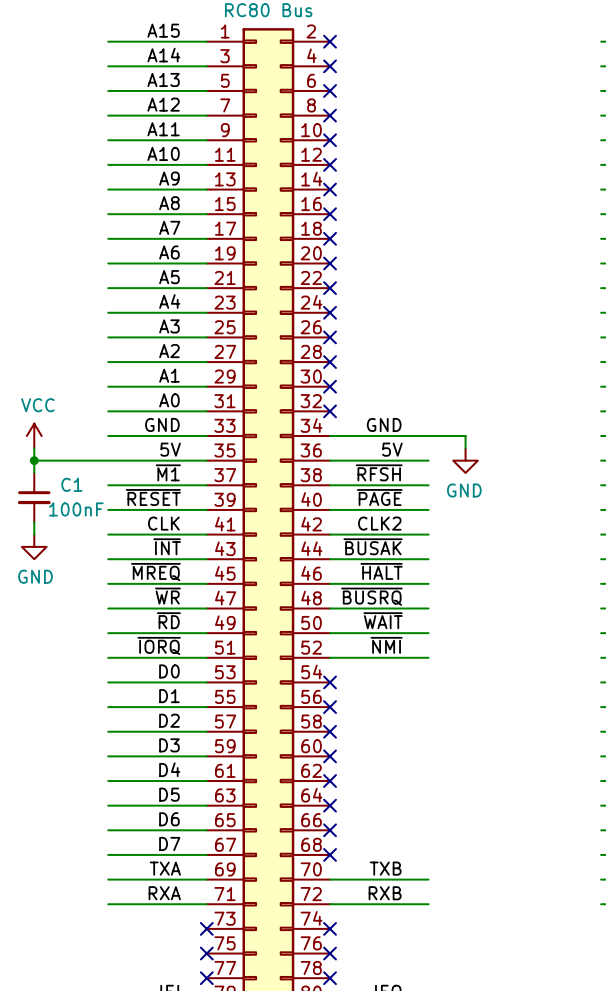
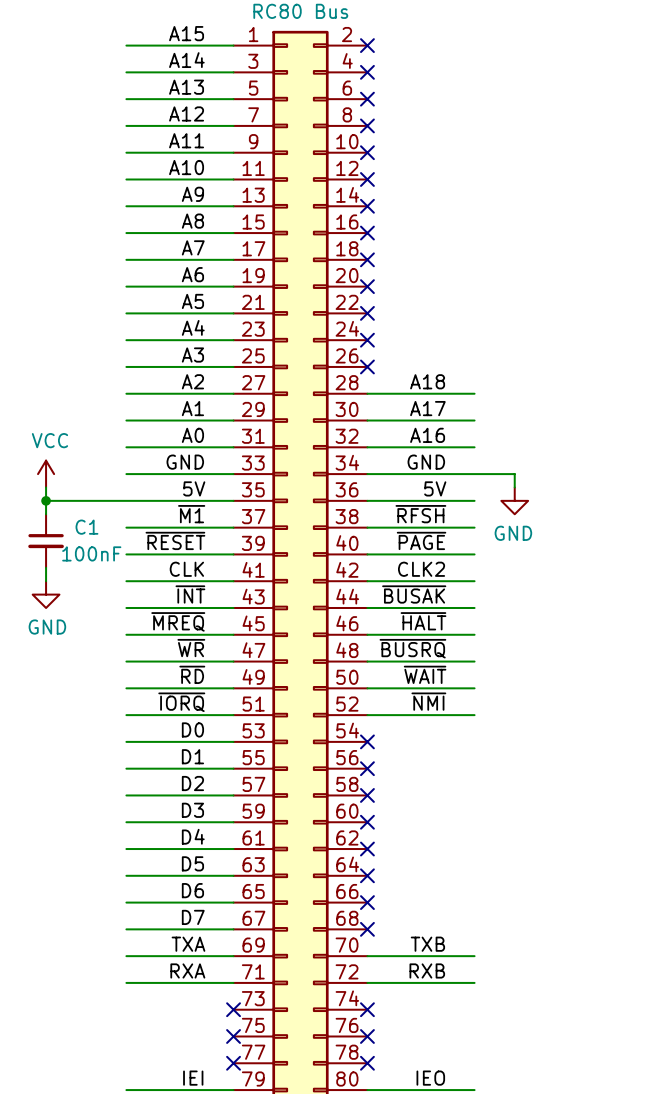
label: none -> A18 (427, 381)
wire: none -> (367, 393) (474, 393)
no-connect mark: (330, 362) -> none
label: none -> A17 (427, 408)
wire: none -> (367, 420) (474, 420)
no-connect mark: (330, 386) -> none
label: none -> A16 (427, 435)
wire: none -> (367, 447) (474, 447)
no-connect mark: (330, 411) -> none

